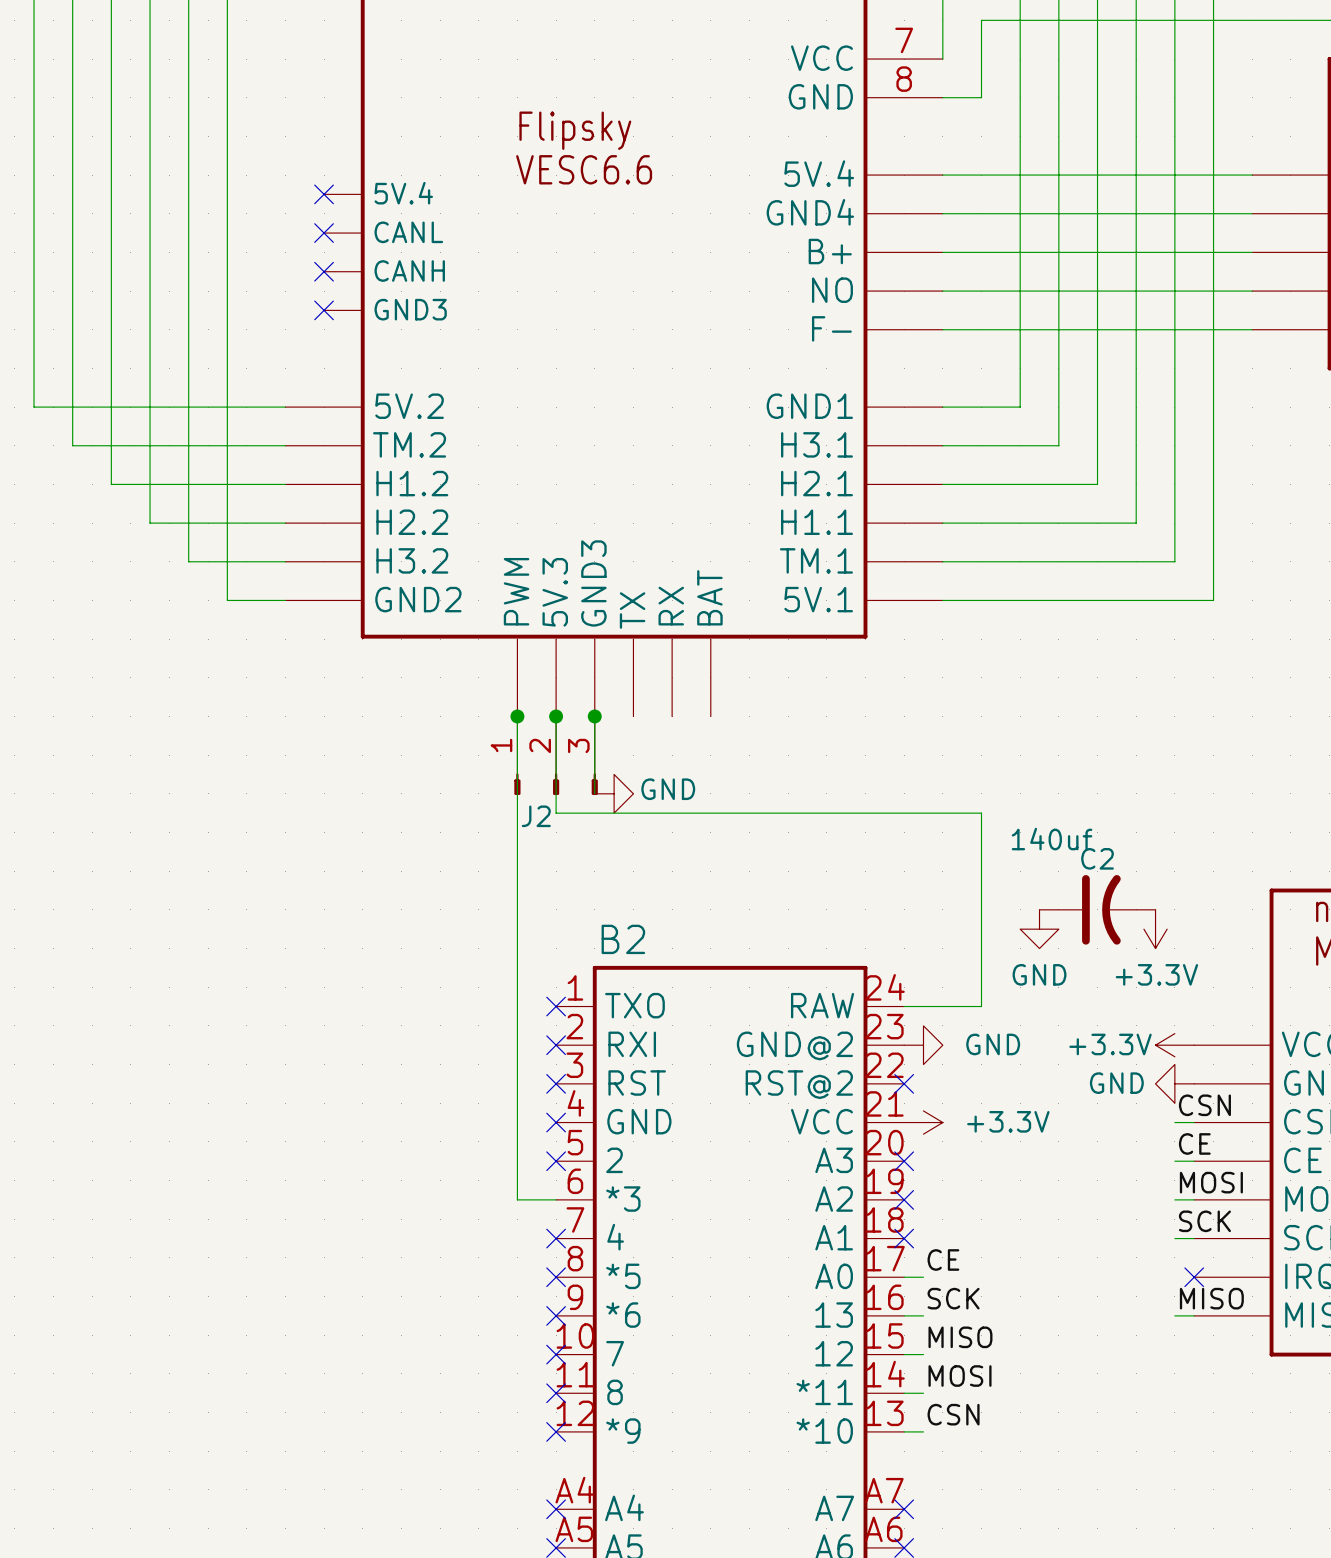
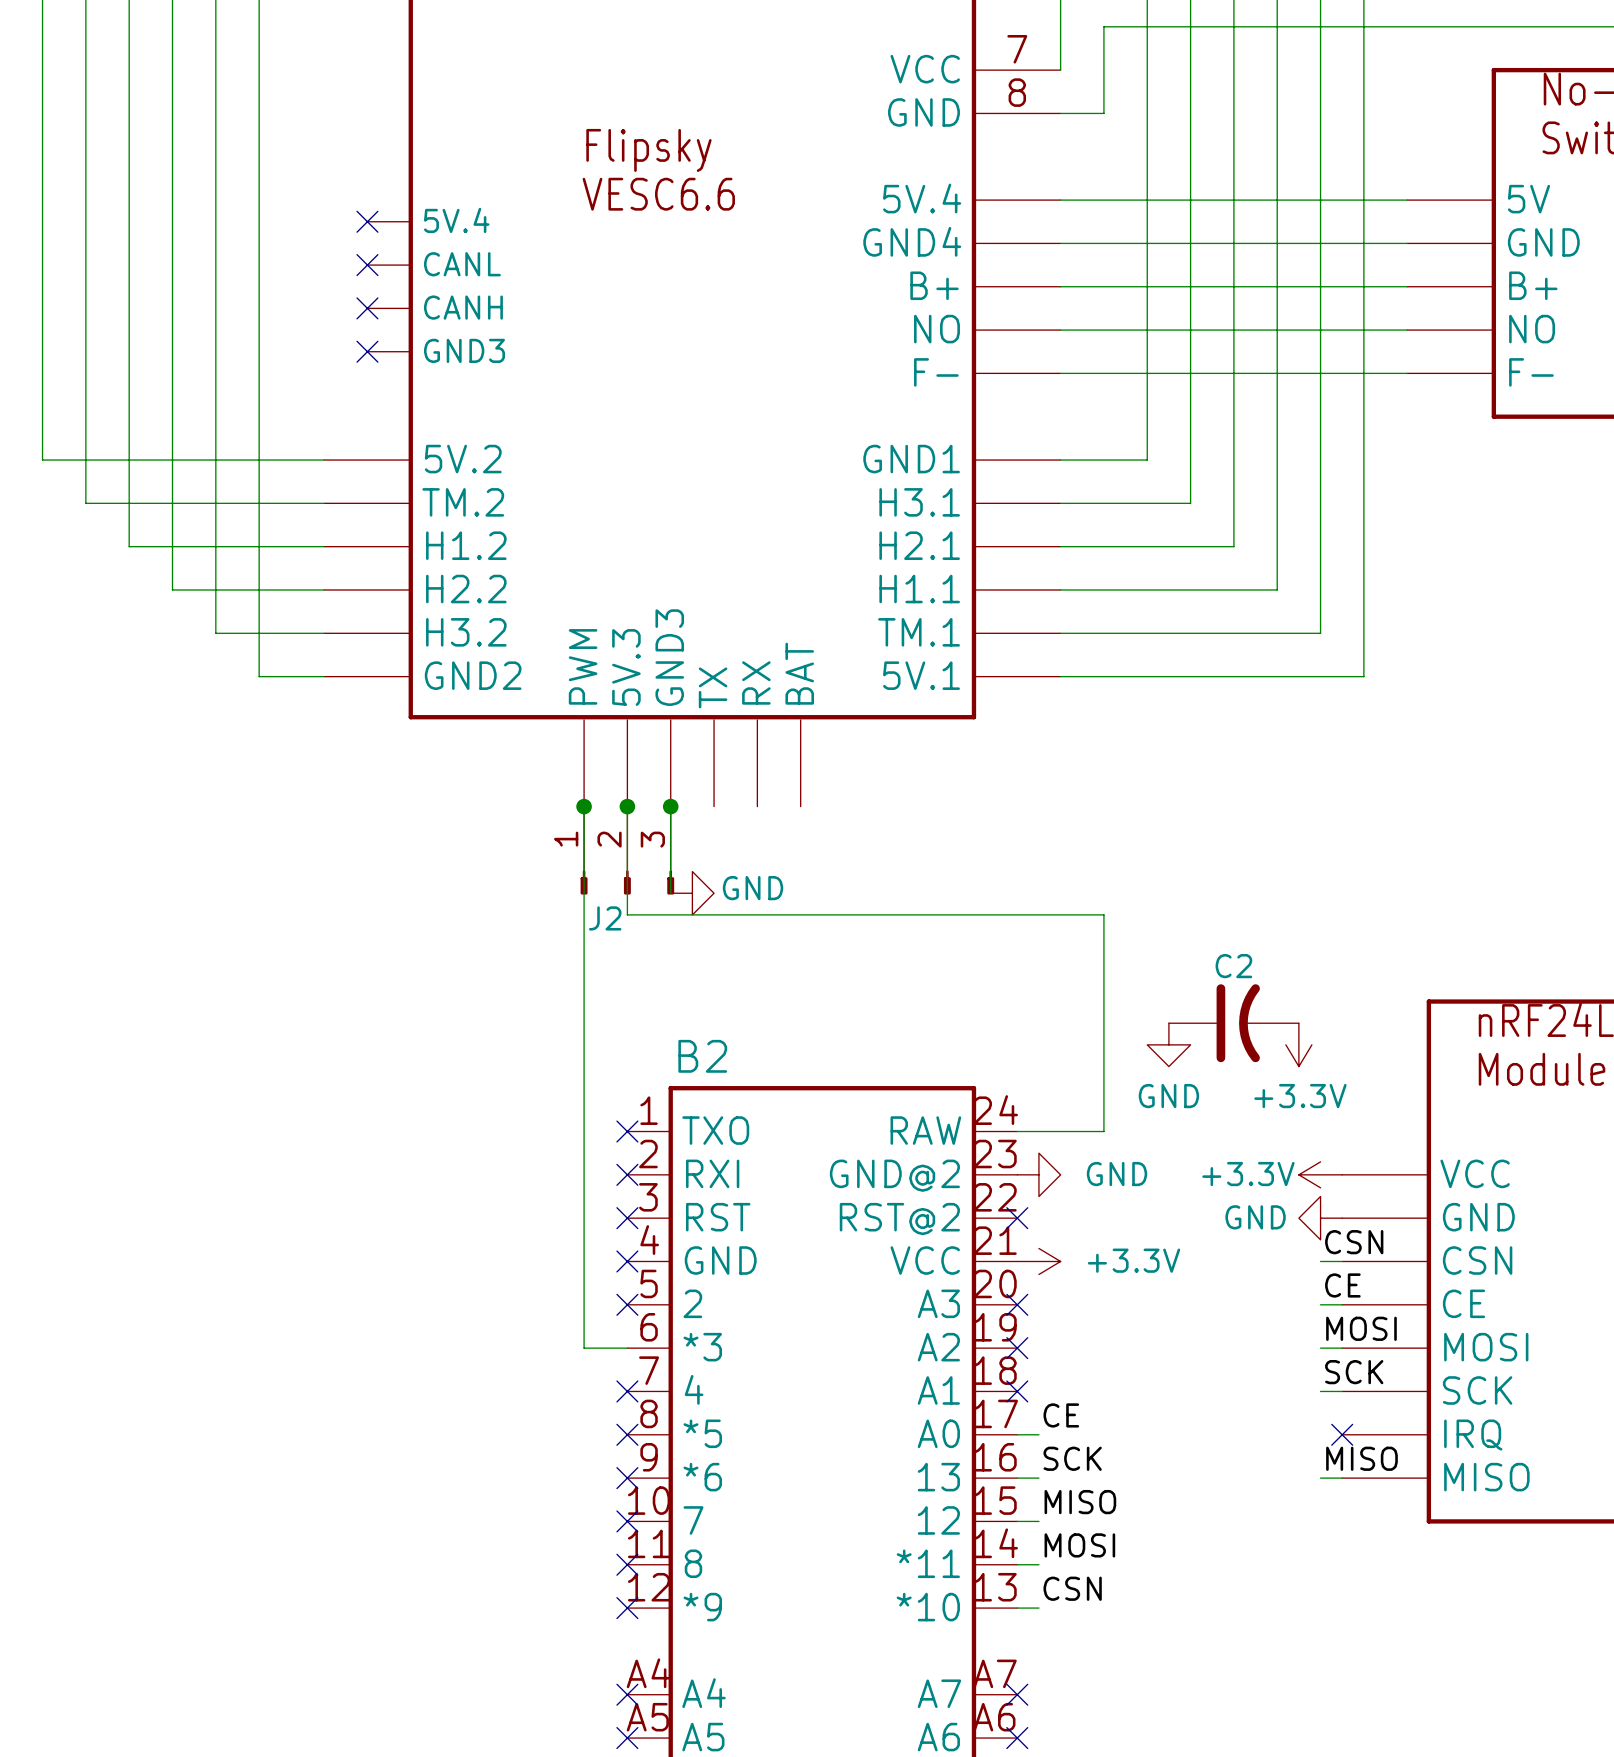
C2 value: 140uf (1052, 839) -> none

